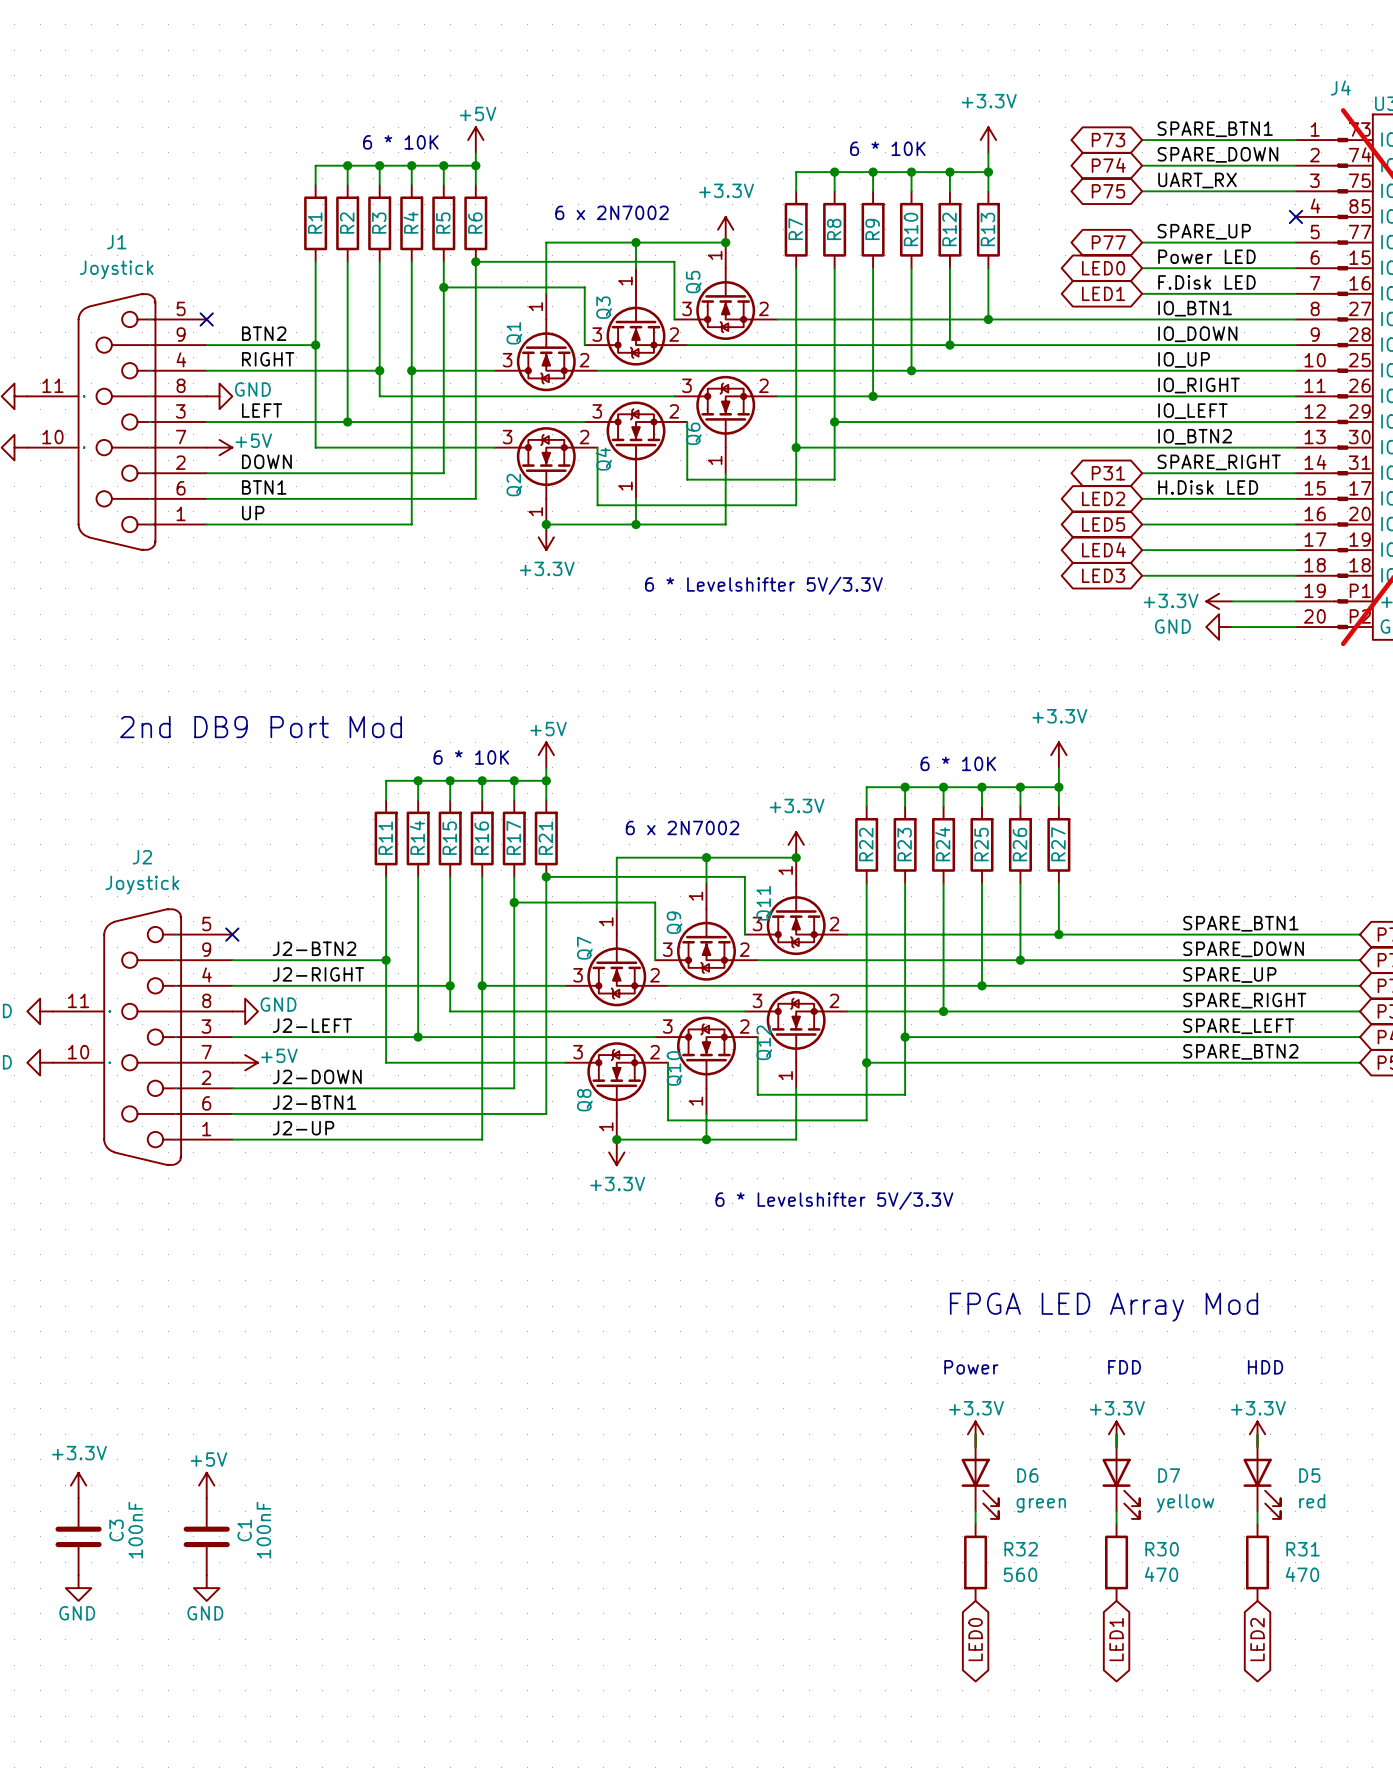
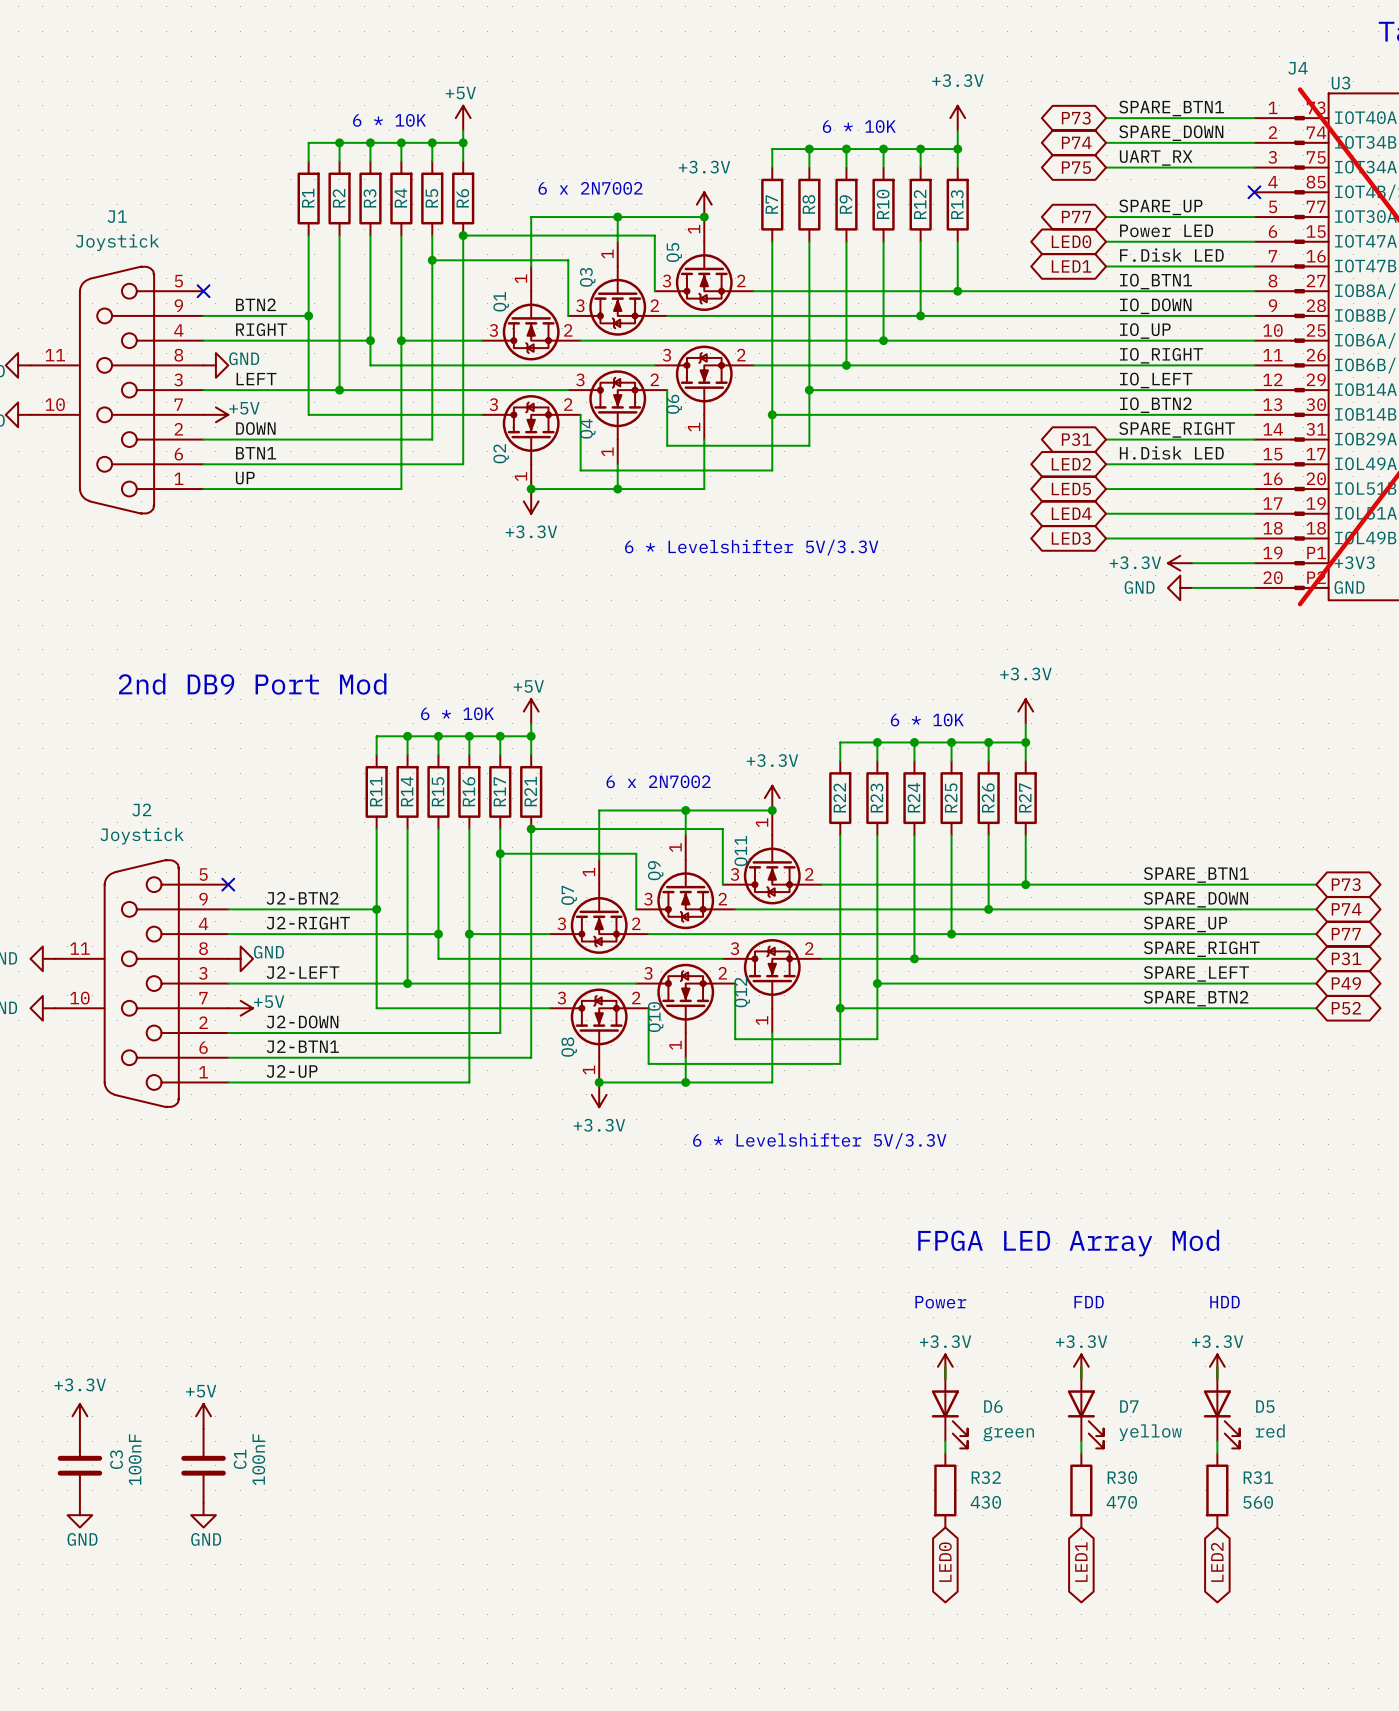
R32 value: 560 (1020, 1574) -> 430 (985, 1502)
R31 value: 470 (1302, 1574) -> 560 (1258, 1502)

